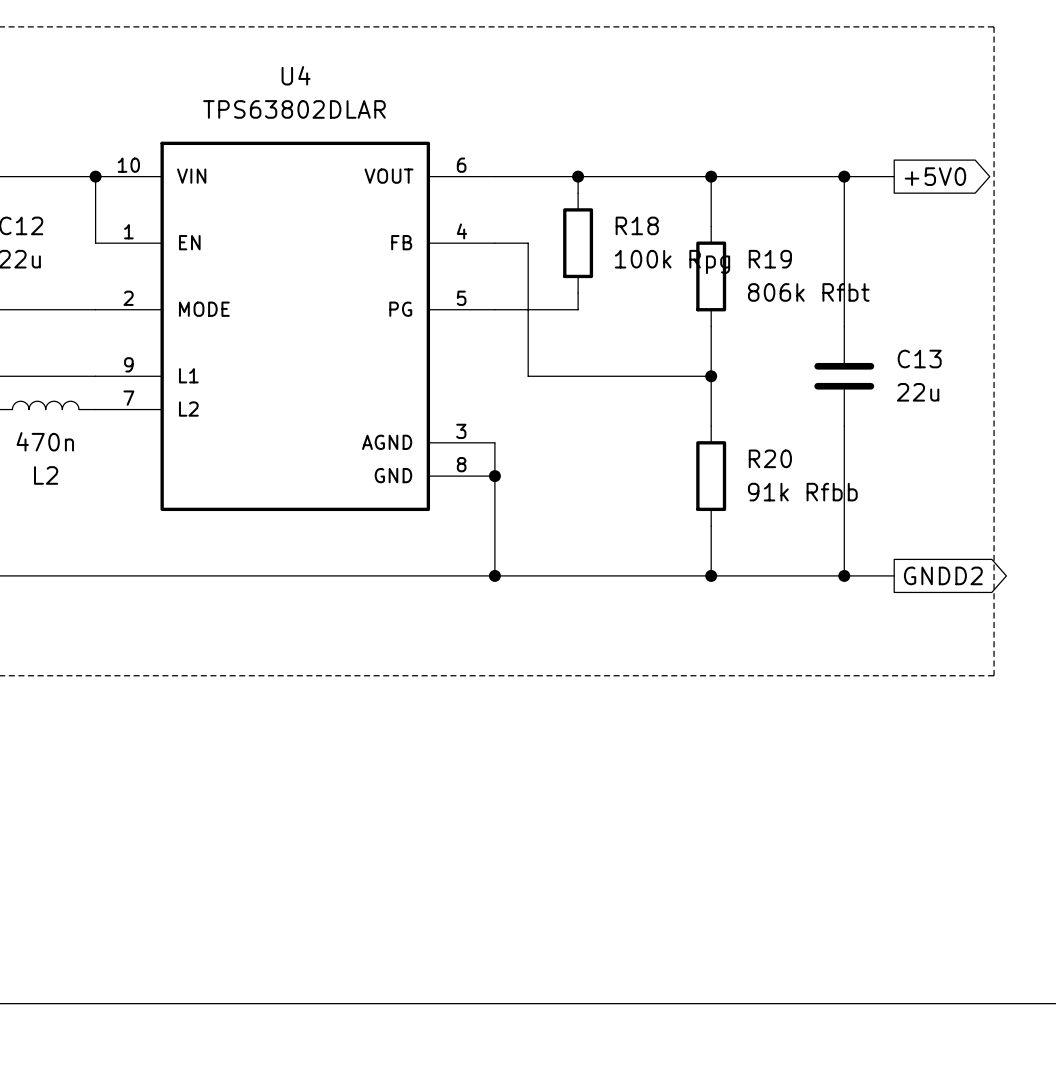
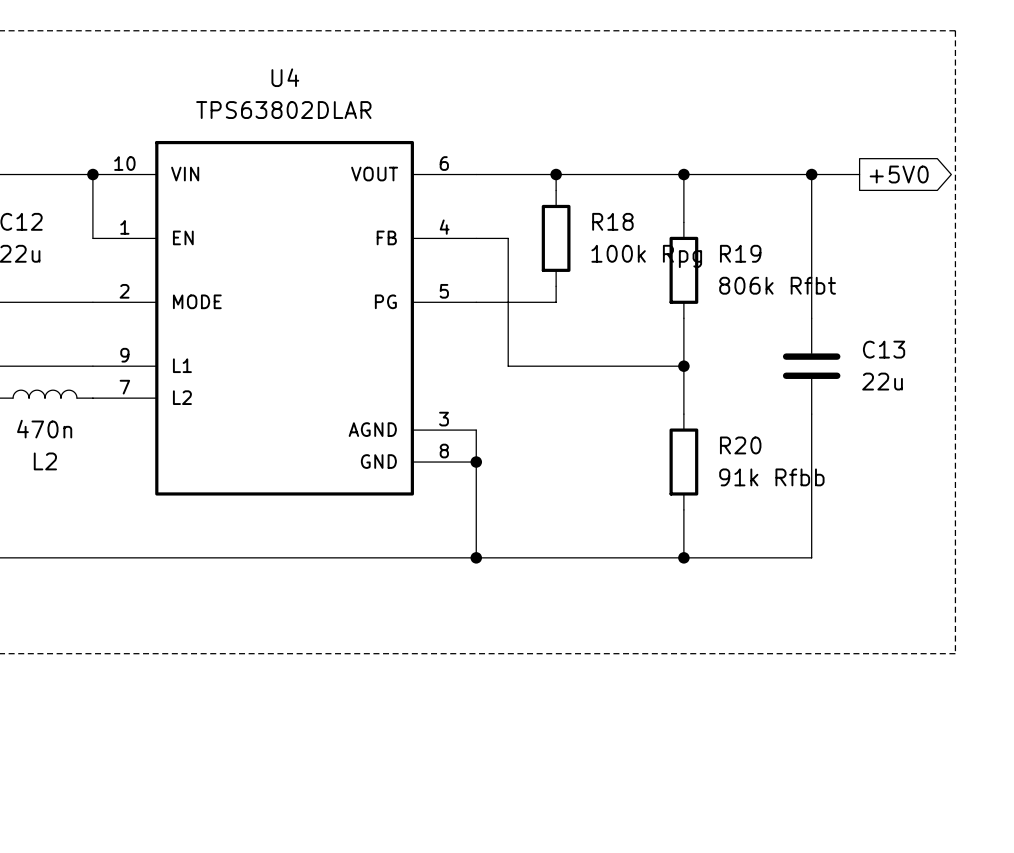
wire: (844, 575) (894, 575) -> none
junction: (844, 575) -> none
global label: GNDD2 (943, 575) -> none

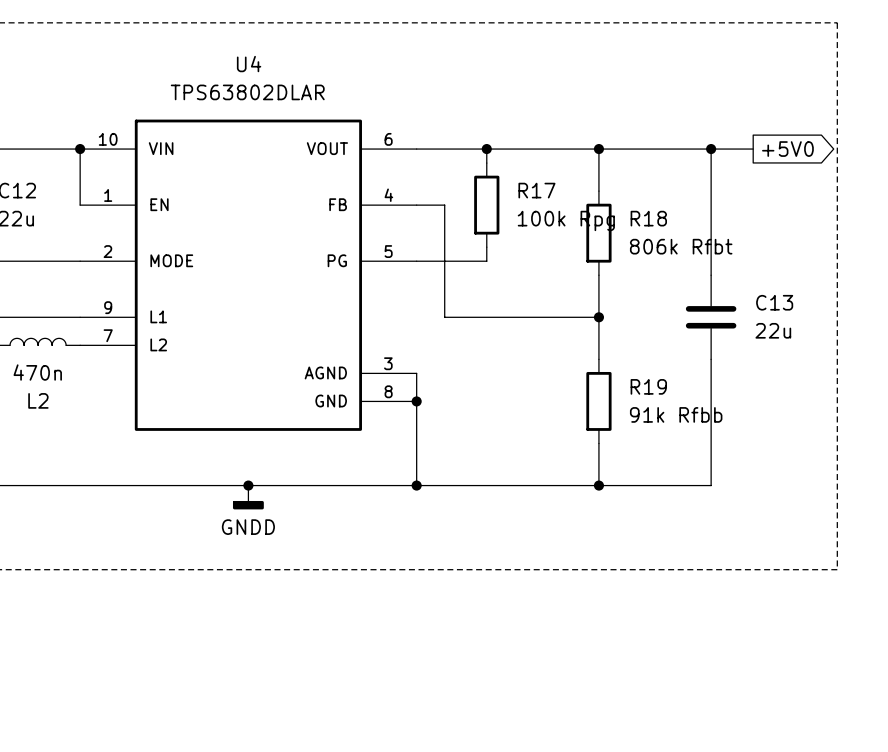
R18 name: R18 (612, 221) -> R17 (536, 190)
R19 name: R19 (740, 253) -> R18 (648, 218)
R20 name: R20 (740, 445) -> R19 (648, 386)
junction: none -> (248, 485)
power symbol: none -> GNDD (248, 497)

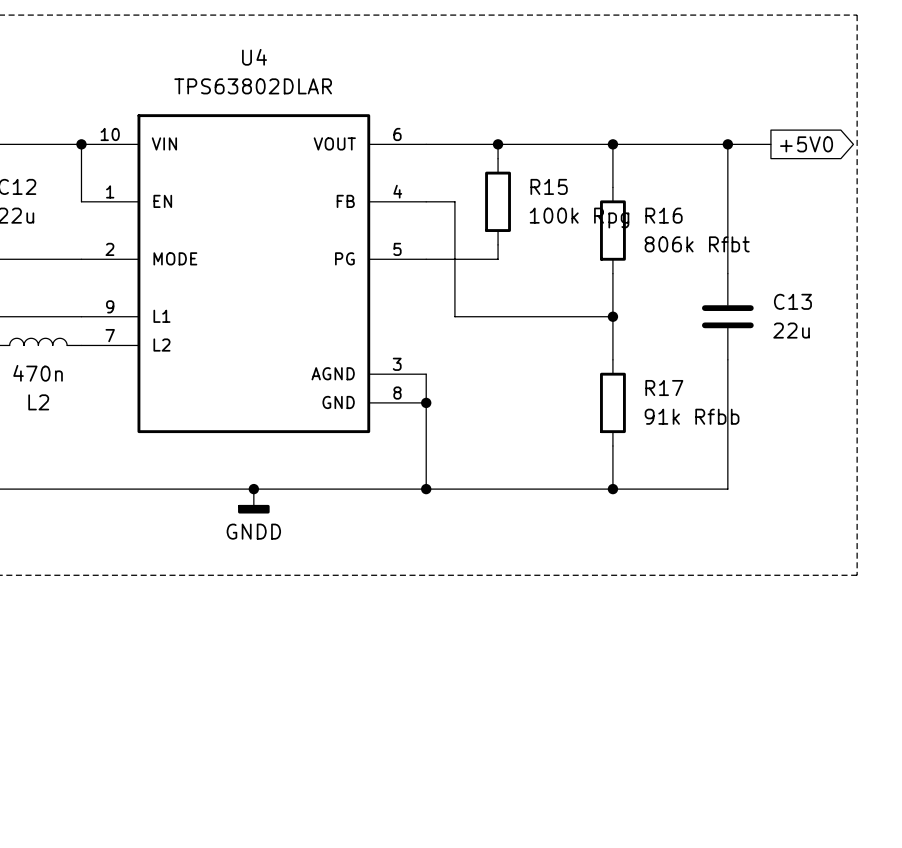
R17 name: R17 (536, 190) -> R15 (549, 186)
R18 name: R18 (648, 218) -> R16 (664, 215)
R19 name: R19 (648, 386) -> R17 (664, 388)

